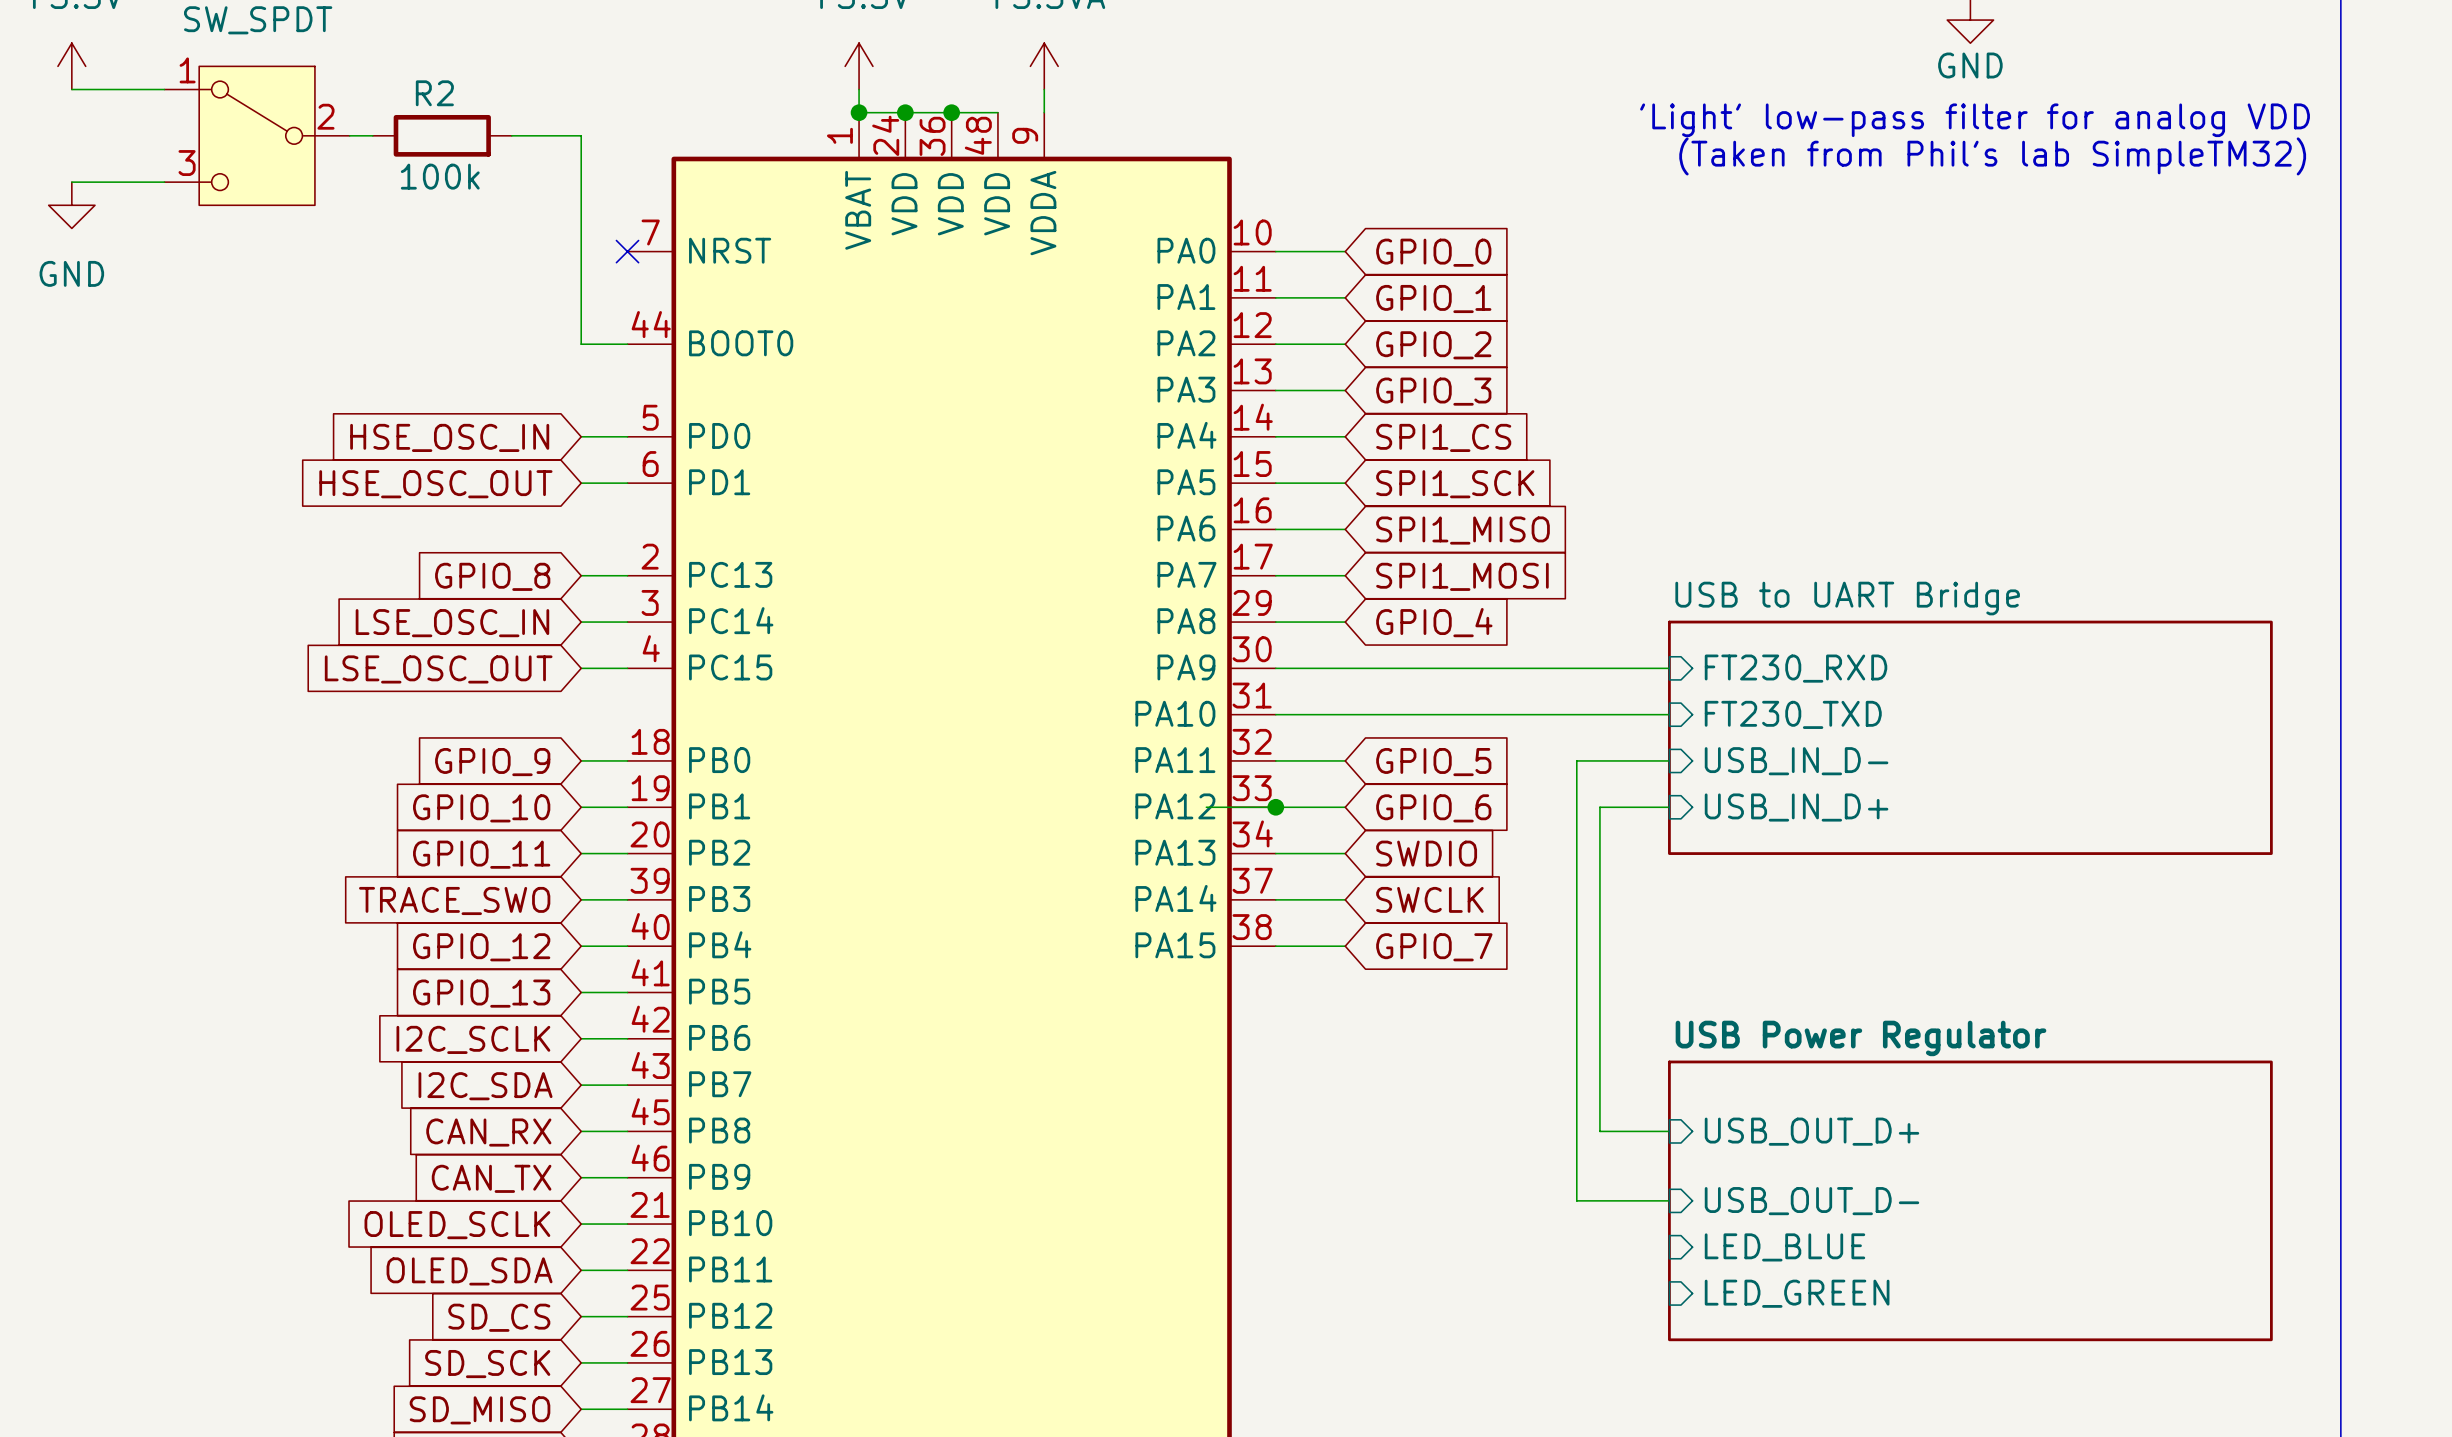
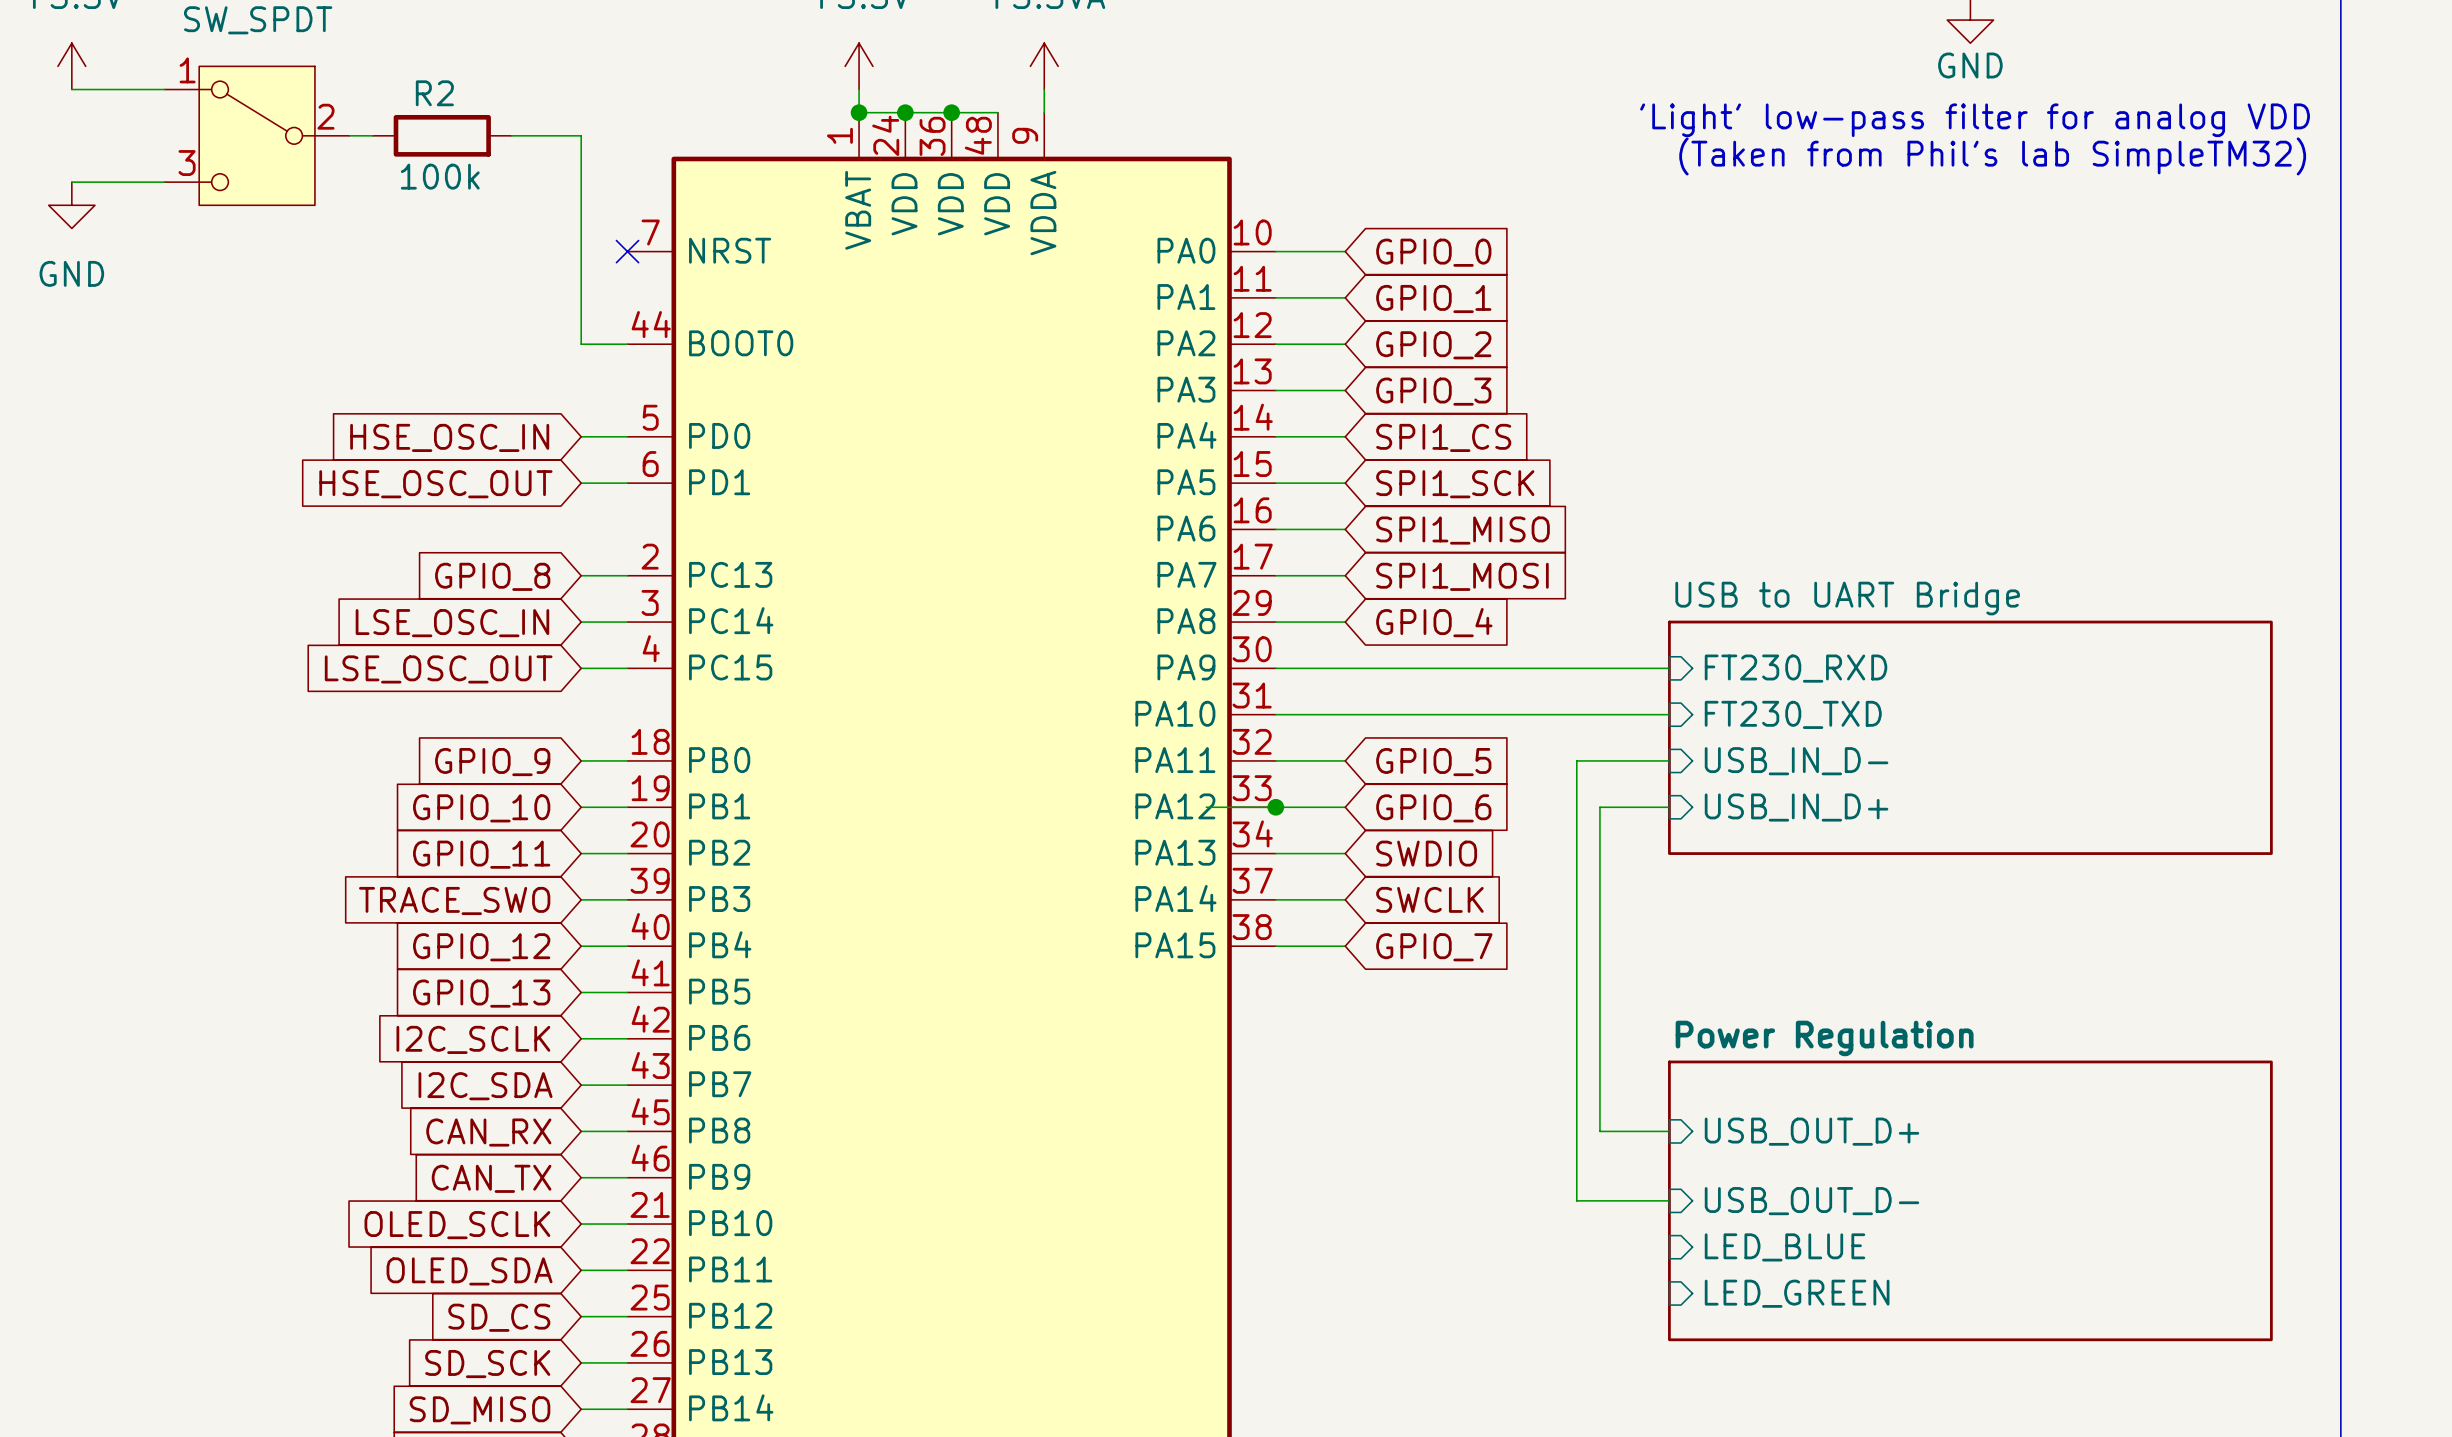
sheet USB Power Regulator name: USB Power Regulator (1860, 1038) -> Power Regulation (1824, 1038)

